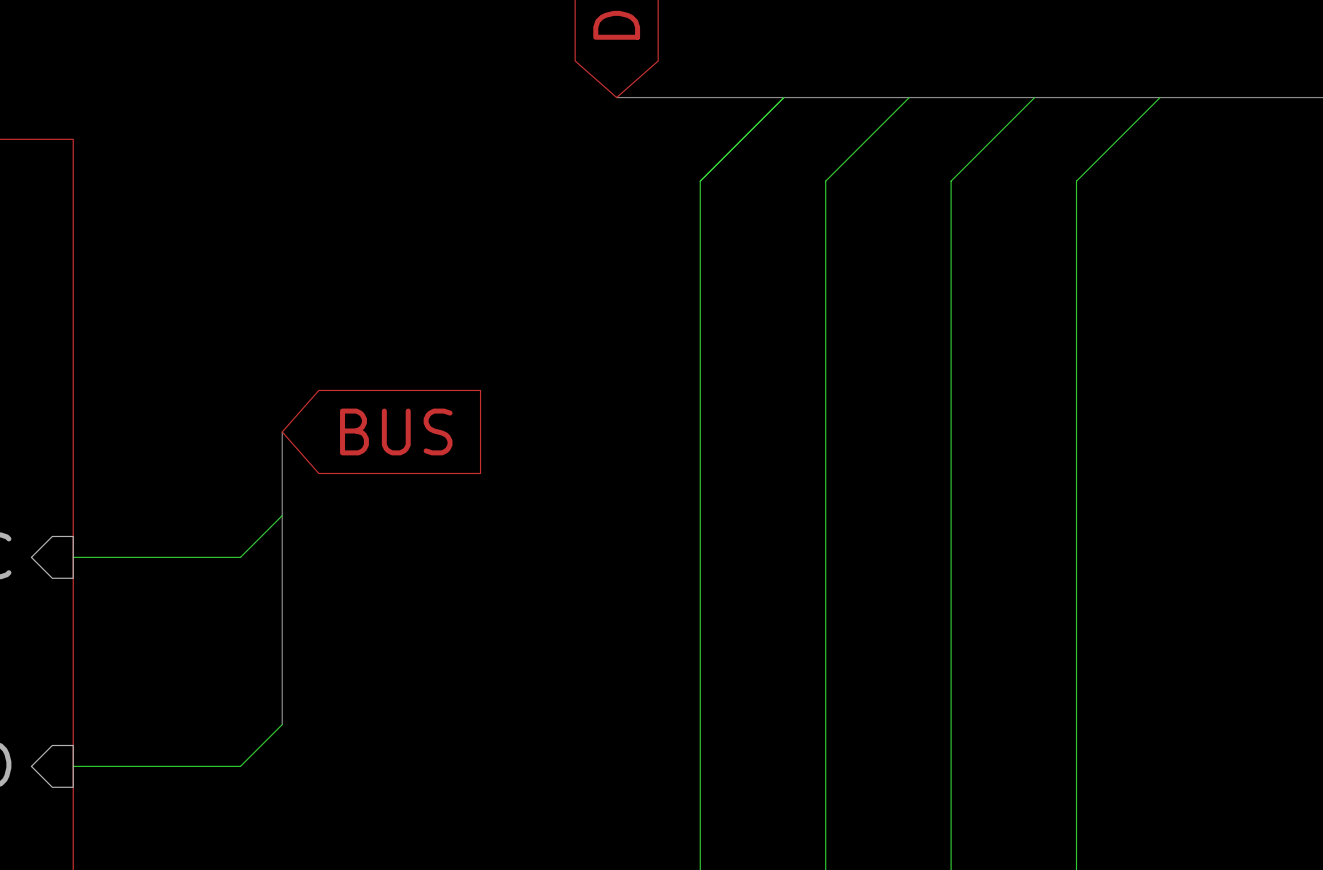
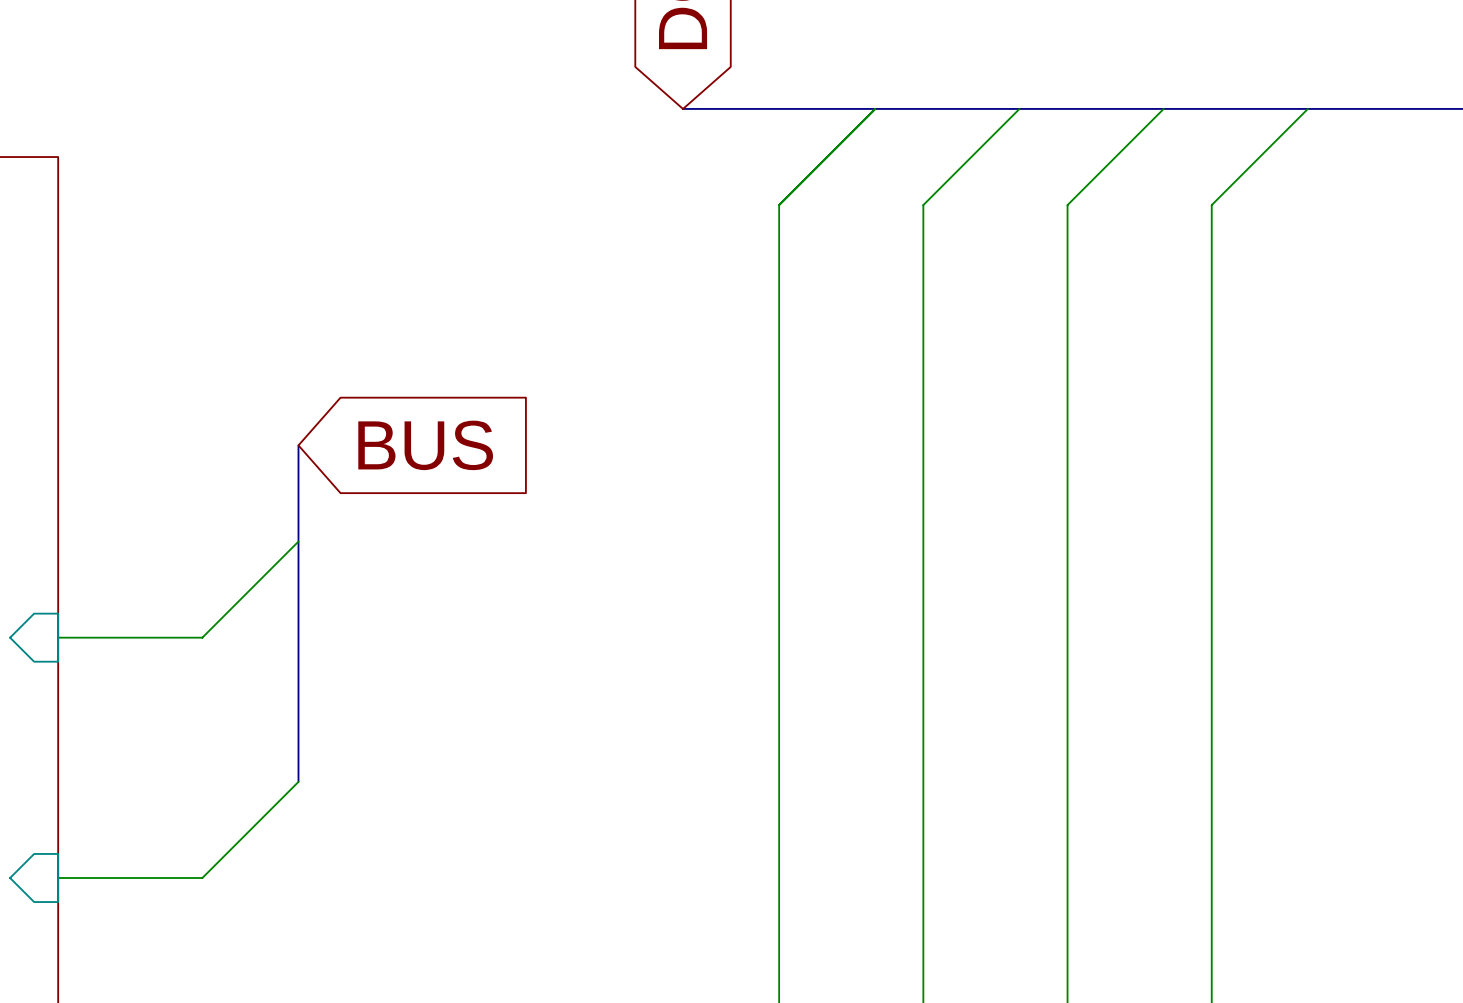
global label position: BUS (396, 431) -> BUS (425, 445)
wire: (282, 515) (240, 557) (198, 557) -> (298, 541) (202, 637)
bus: (282, 682) (282, 724) -> (298, 445) (298, 493)
wire: (282, 724) (240, 766) (198, 766) -> (298, 781) (202, 878)

